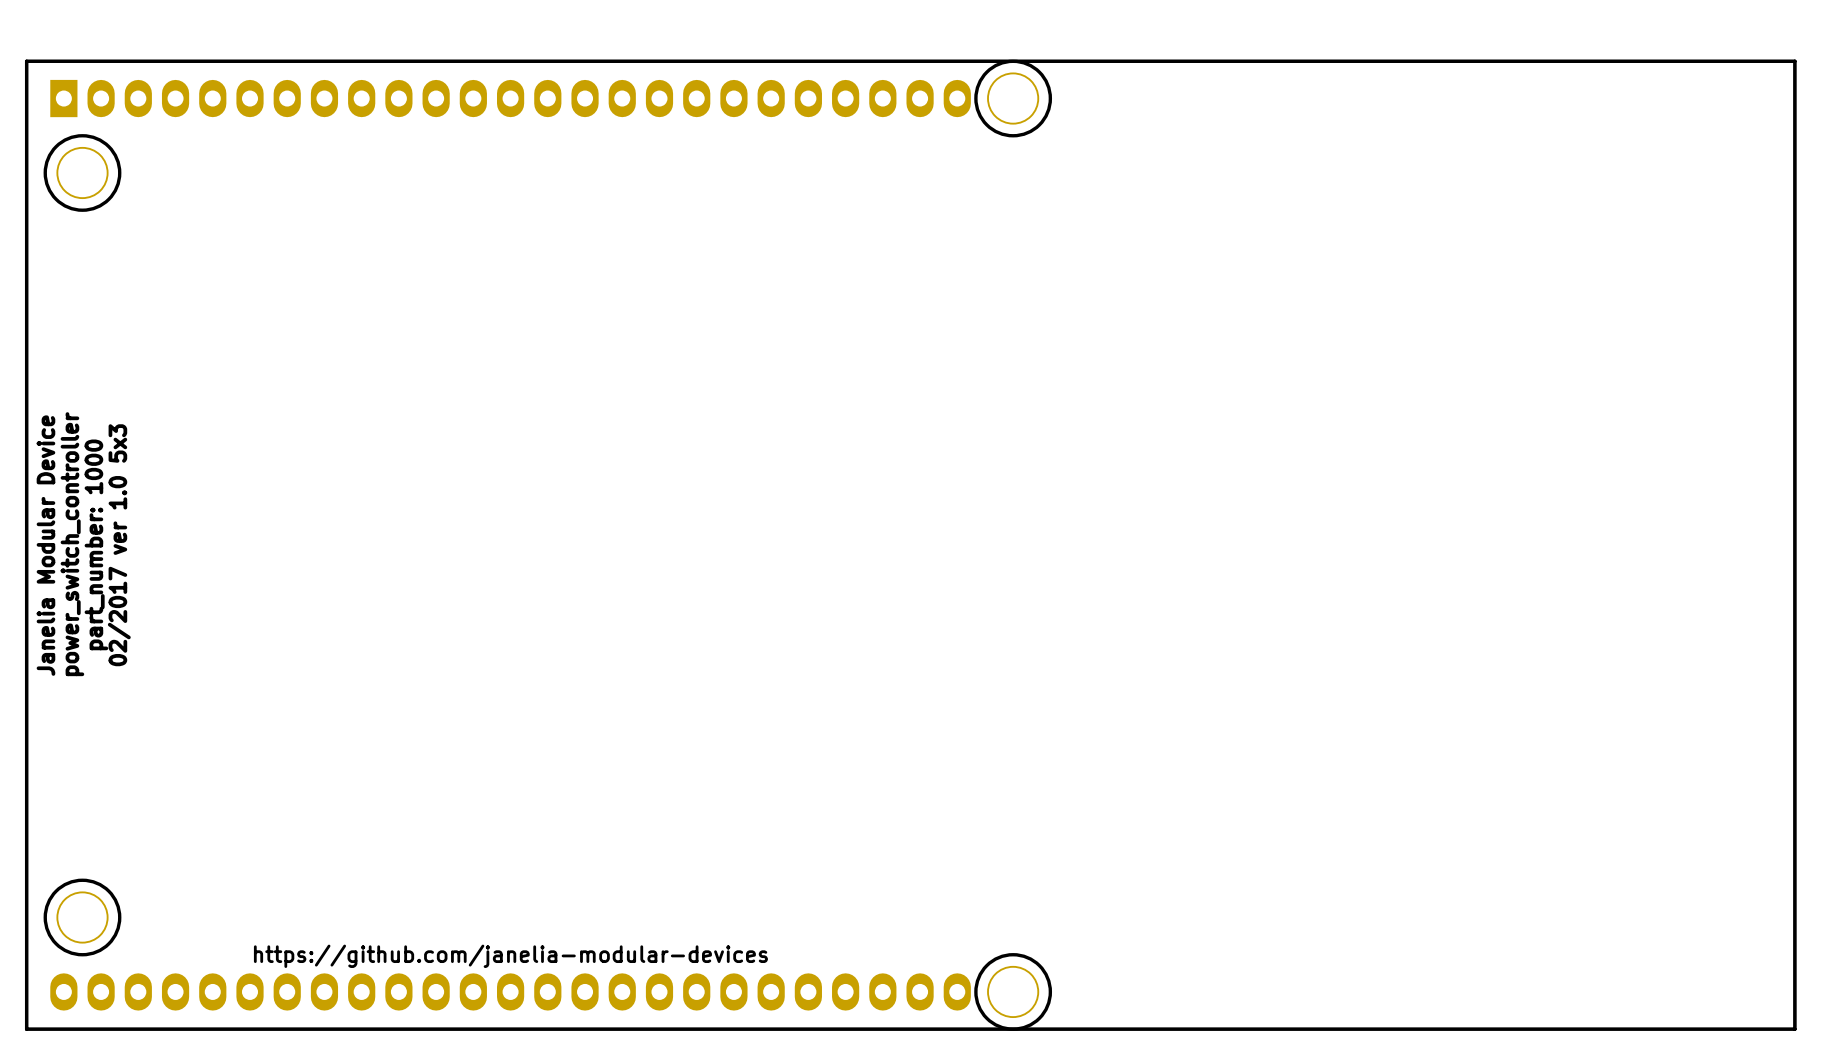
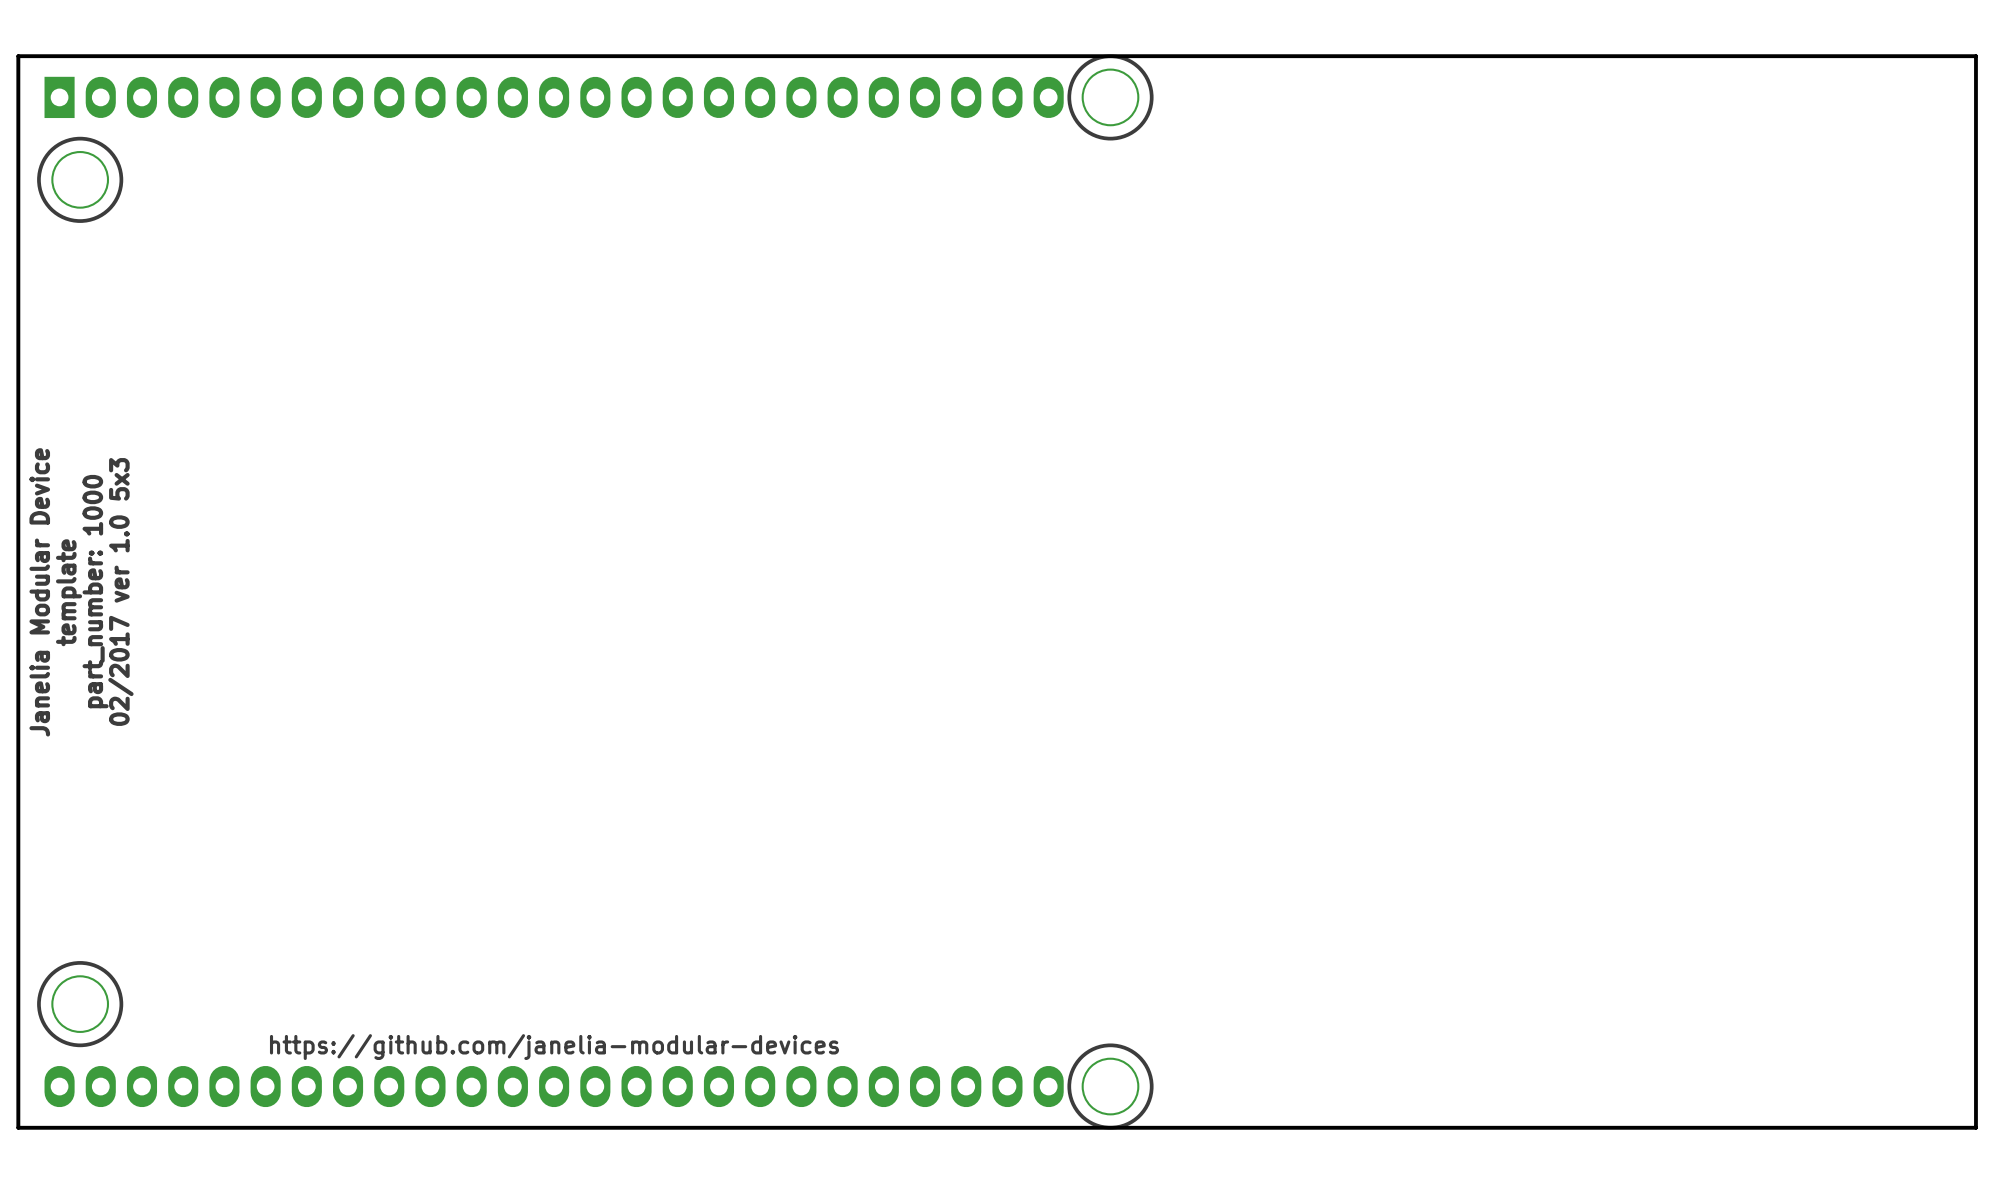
text: power_switch_controller (72, 544) -> template (69, 592)

